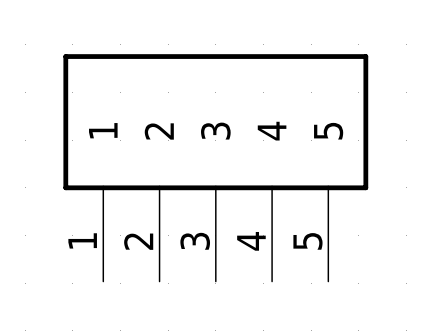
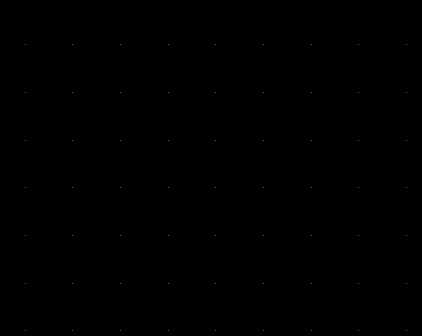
part: (215, 167) -> none

